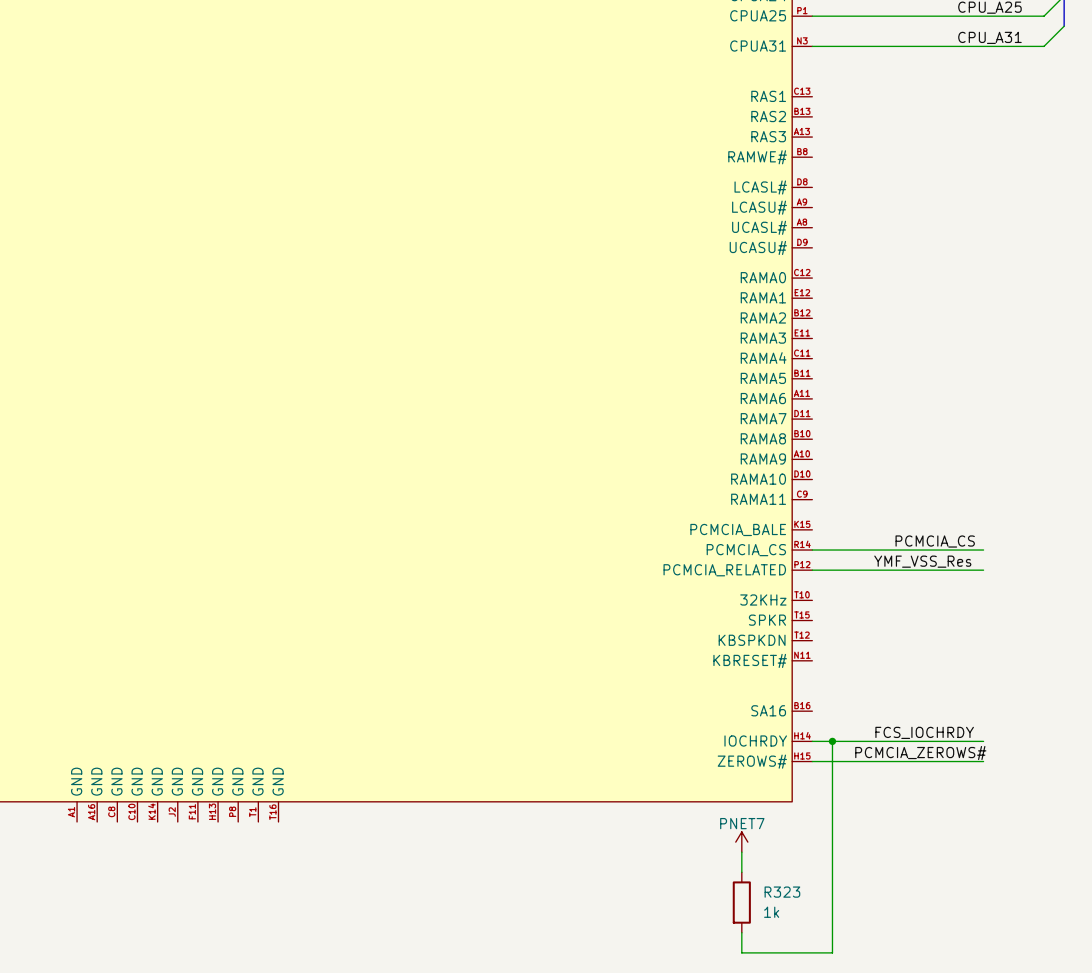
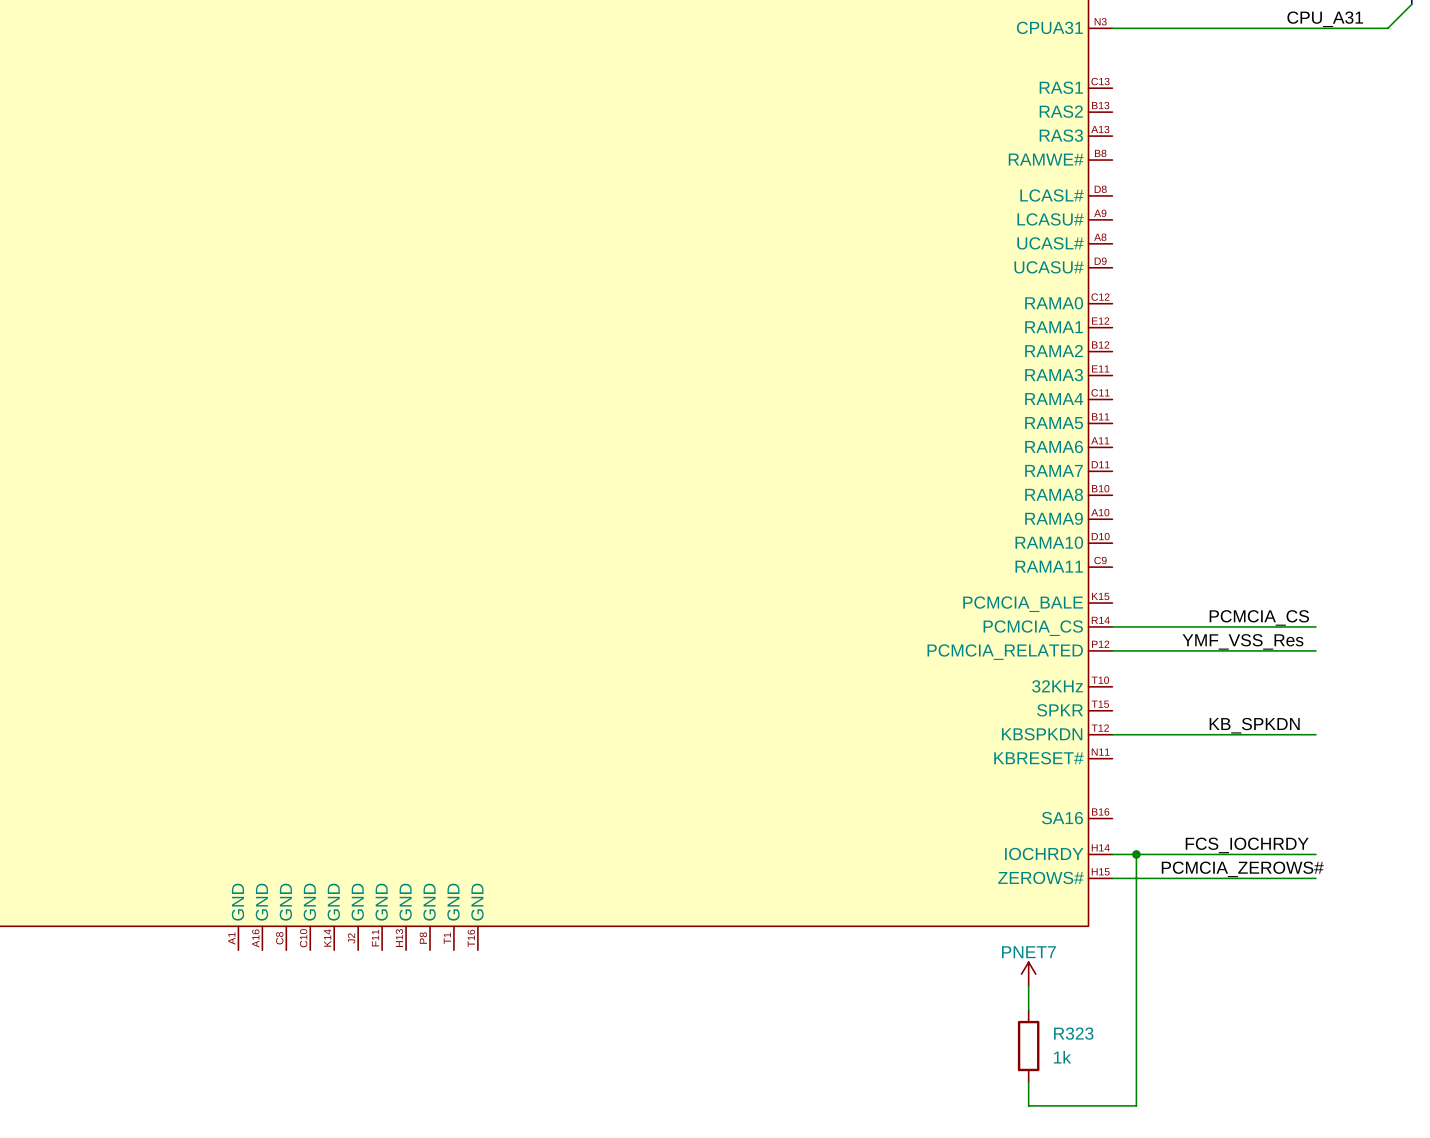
label: none -> KB_SPKDN (1254, 725)
wire: none -> (1112, 734) (1316, 734)

